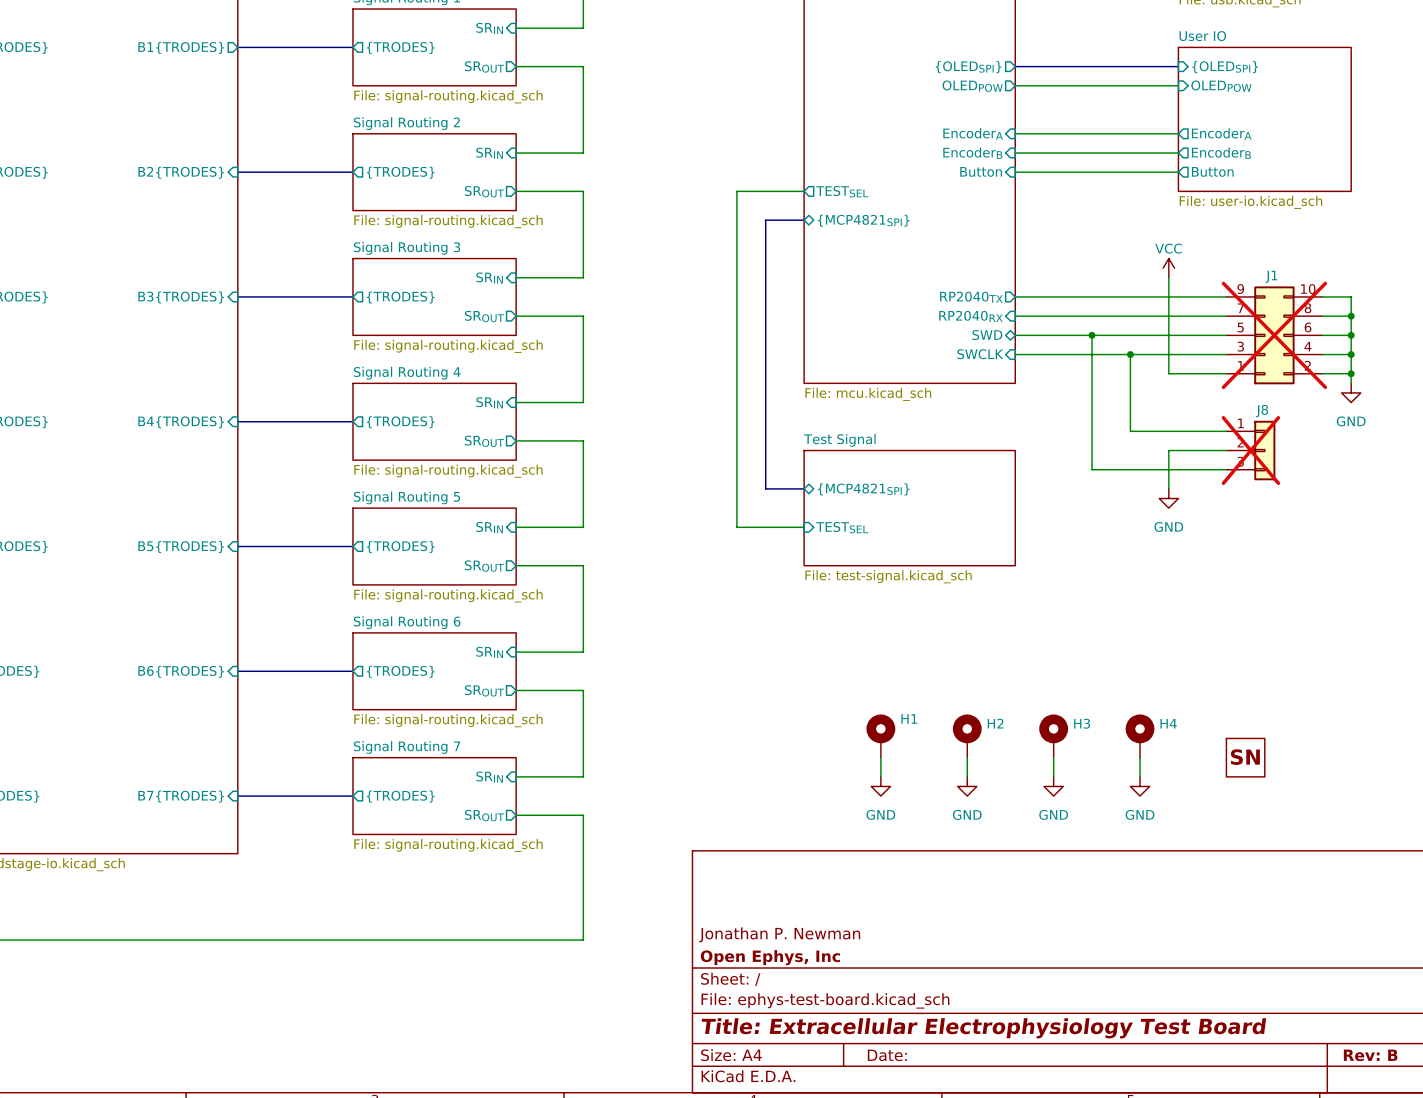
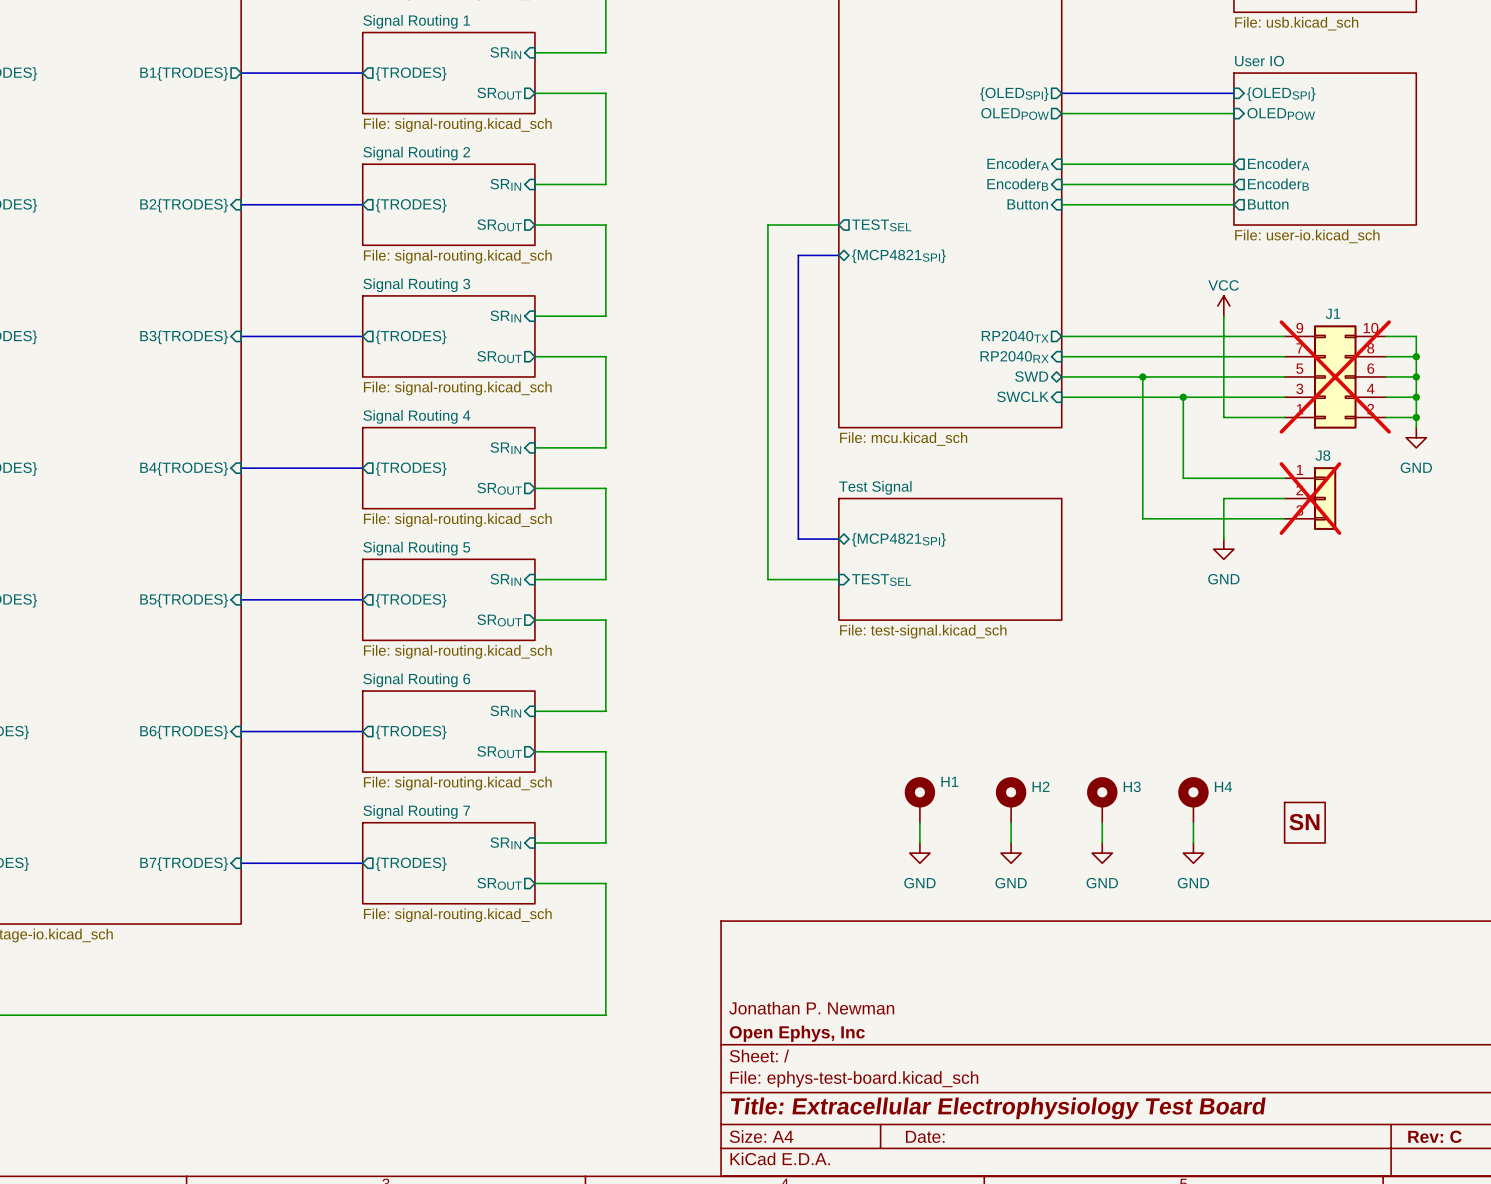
title block: Rev: B (1370, 1055) -> Rev: C (1434, 1136)

